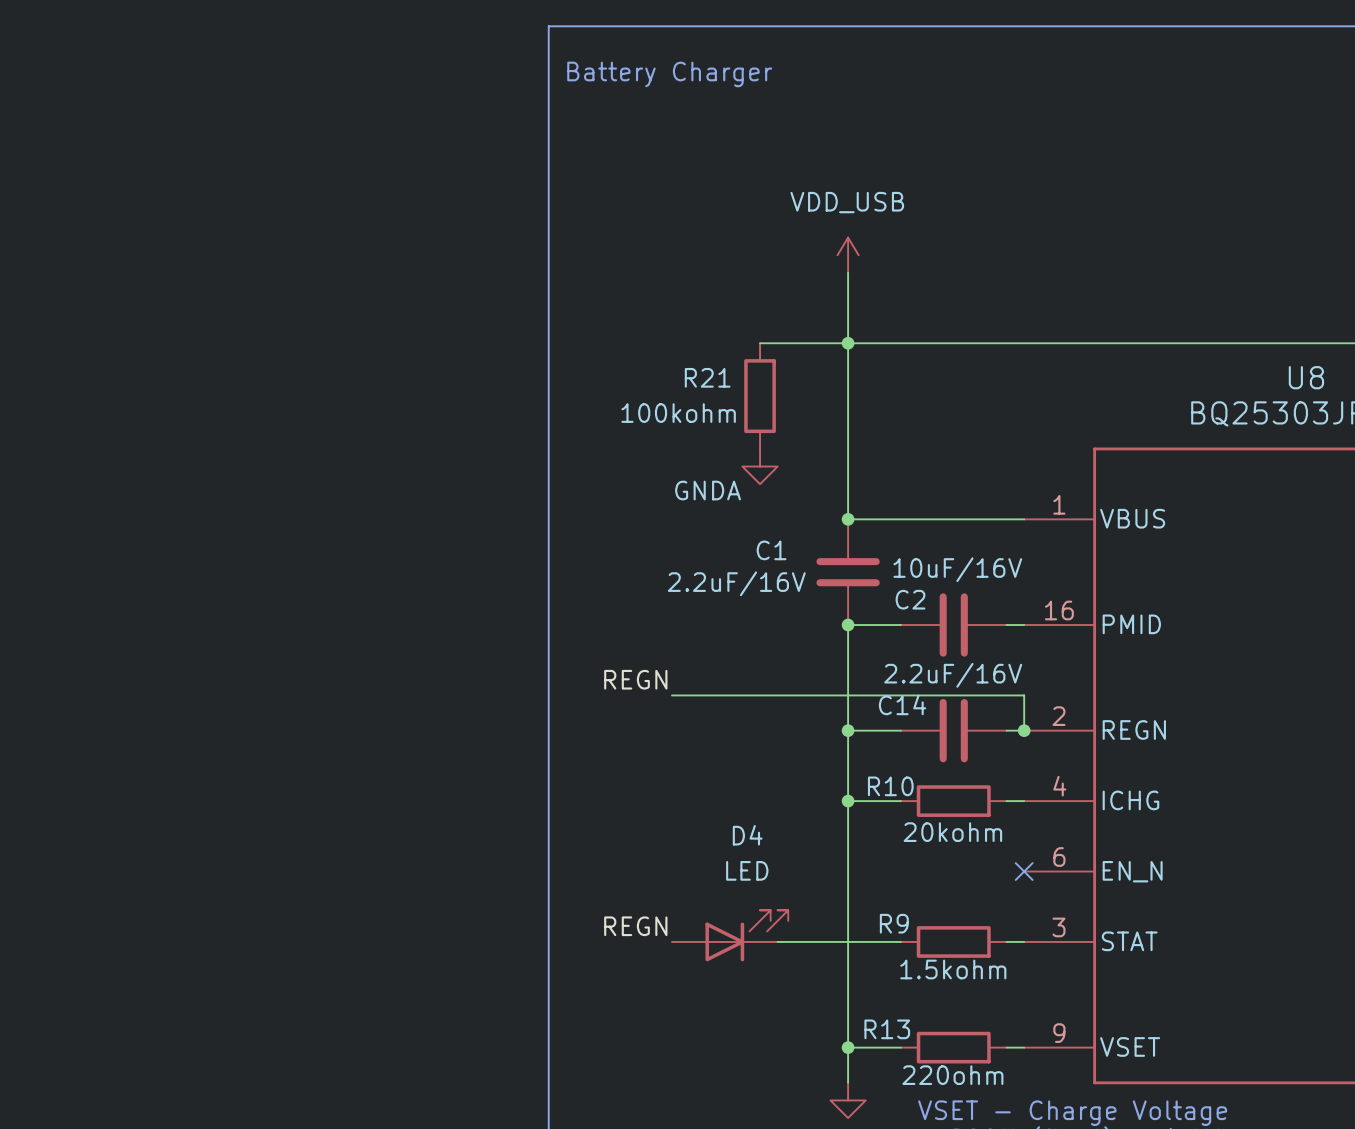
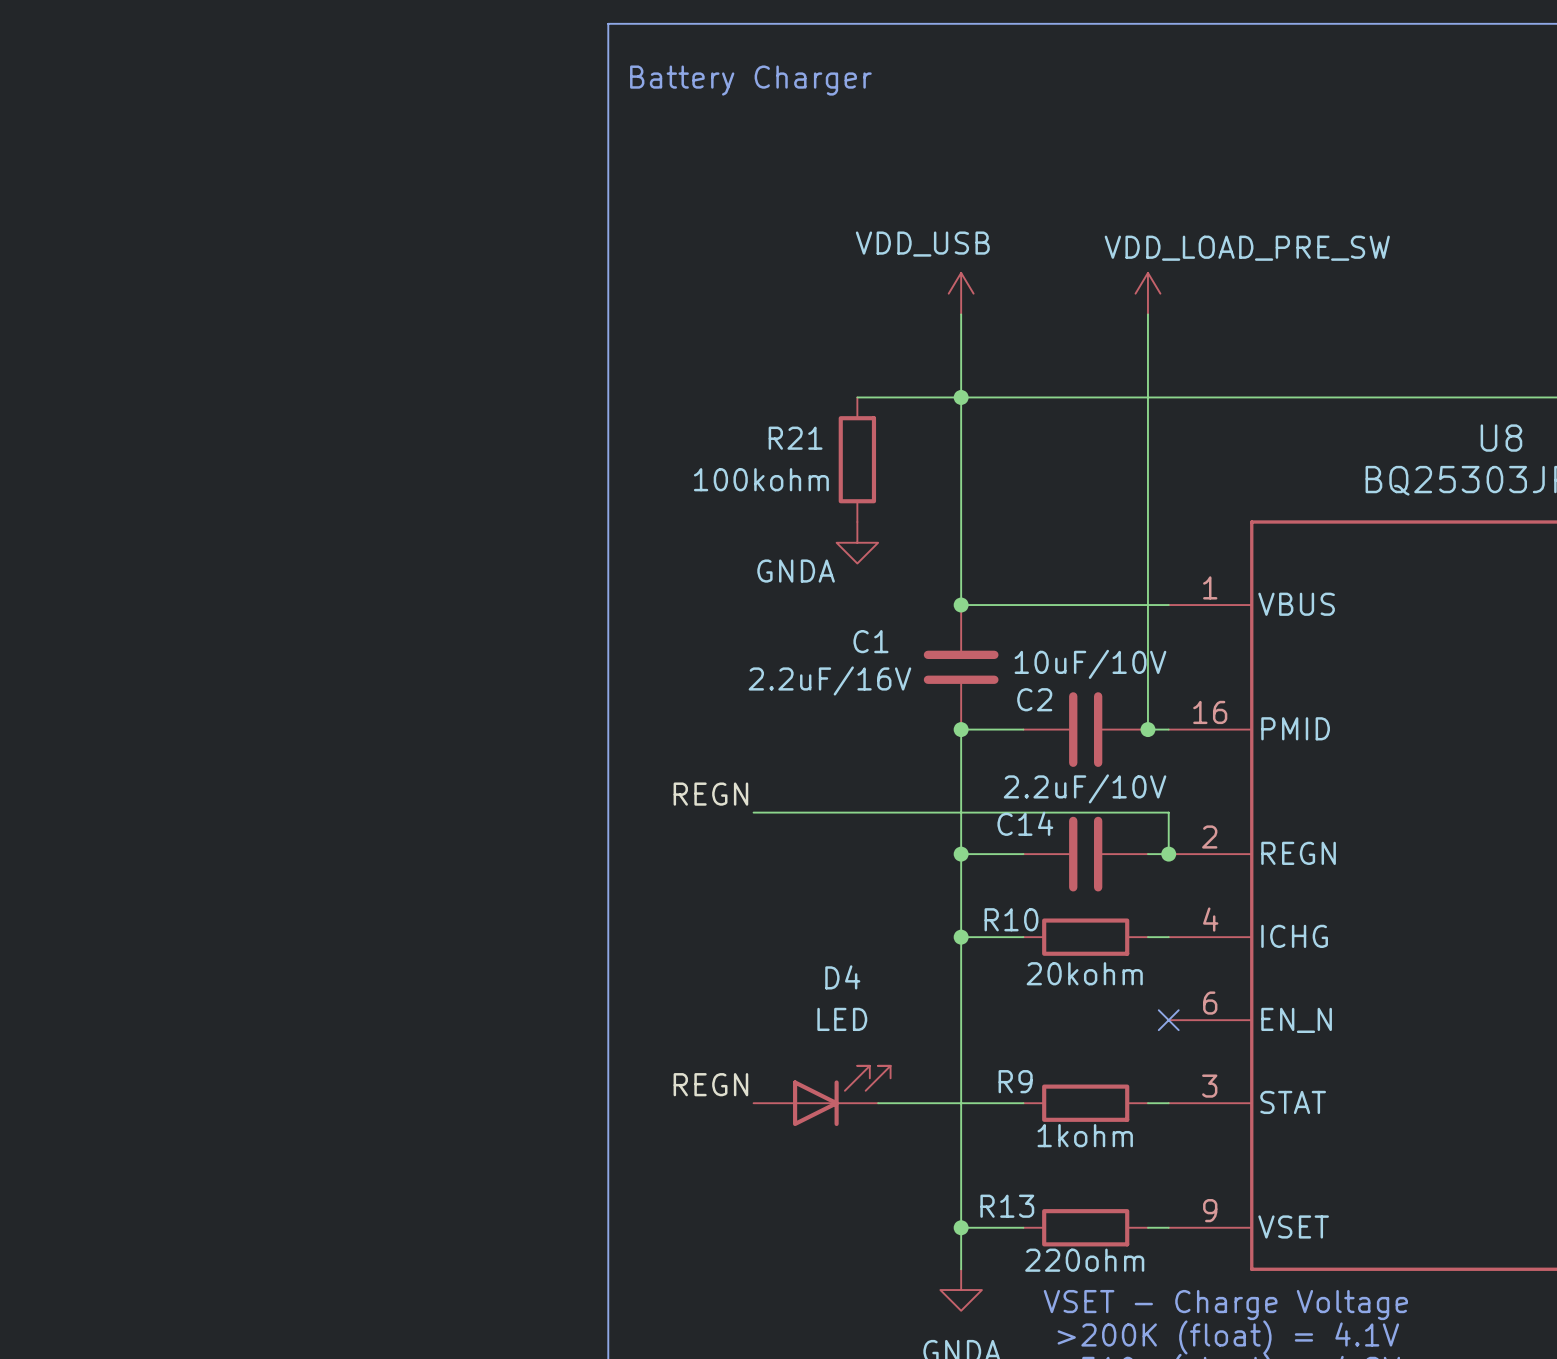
power symbol text position: VDD_USB (847, 202) -> VDD_USB (922, 244)
power symbol: none -> VDD_LOAD_PRE_SW (1147, 293)
wire: none -> (1147, 314) (1147, 729)
C2 value: 10uF/16V (957, 569) -> 10uF/10V (1090, 664)
junction: none -> (1147, 729)
C14 value: 2.2uF/16V (953, 675) -> 2.2uF/10V (1085, 788)
R9 value: 1.5kohm (953, 969) -> 1kohm (1085, 1135)

